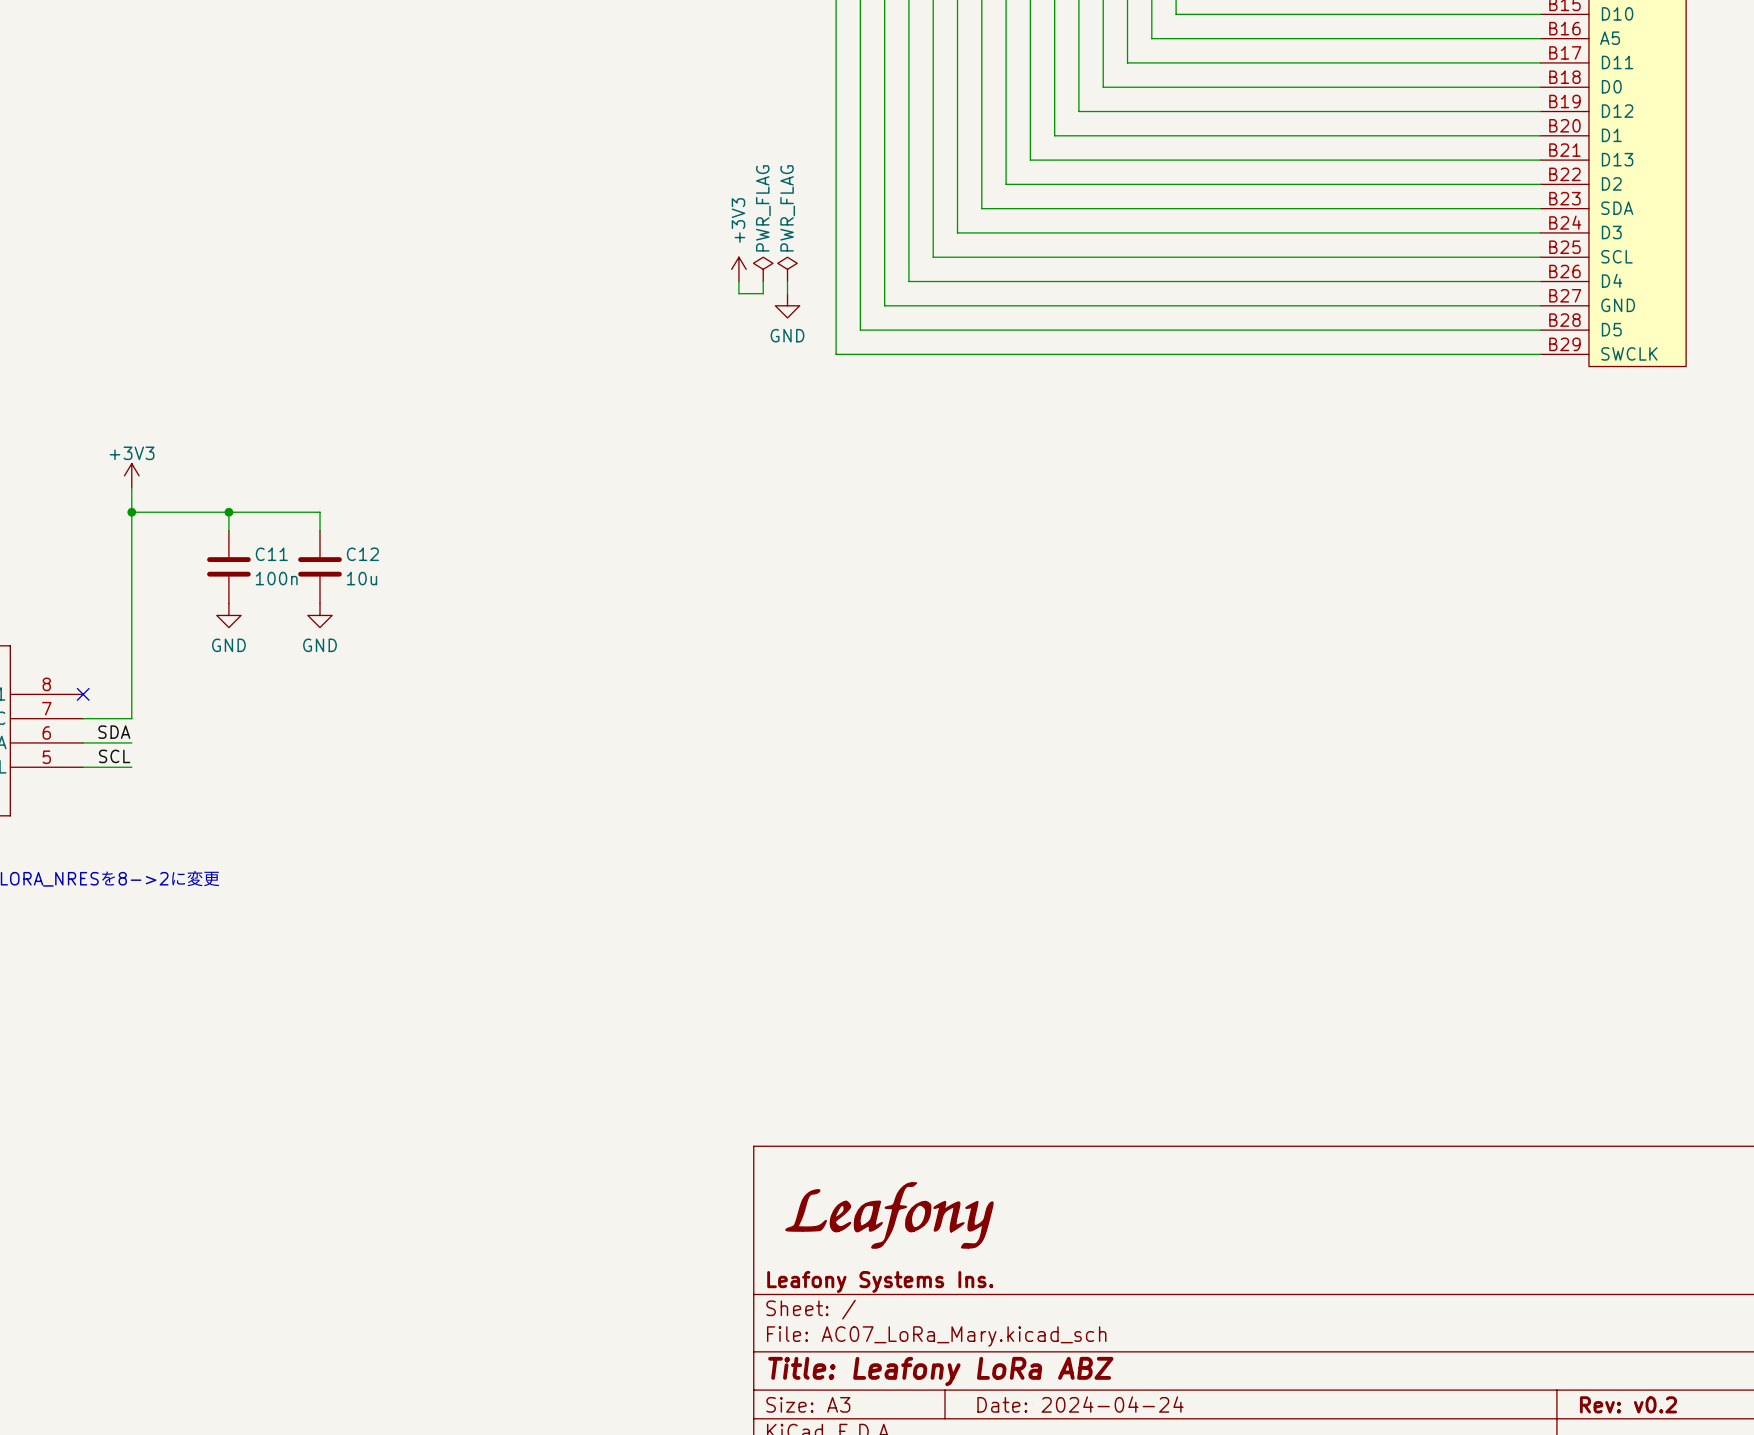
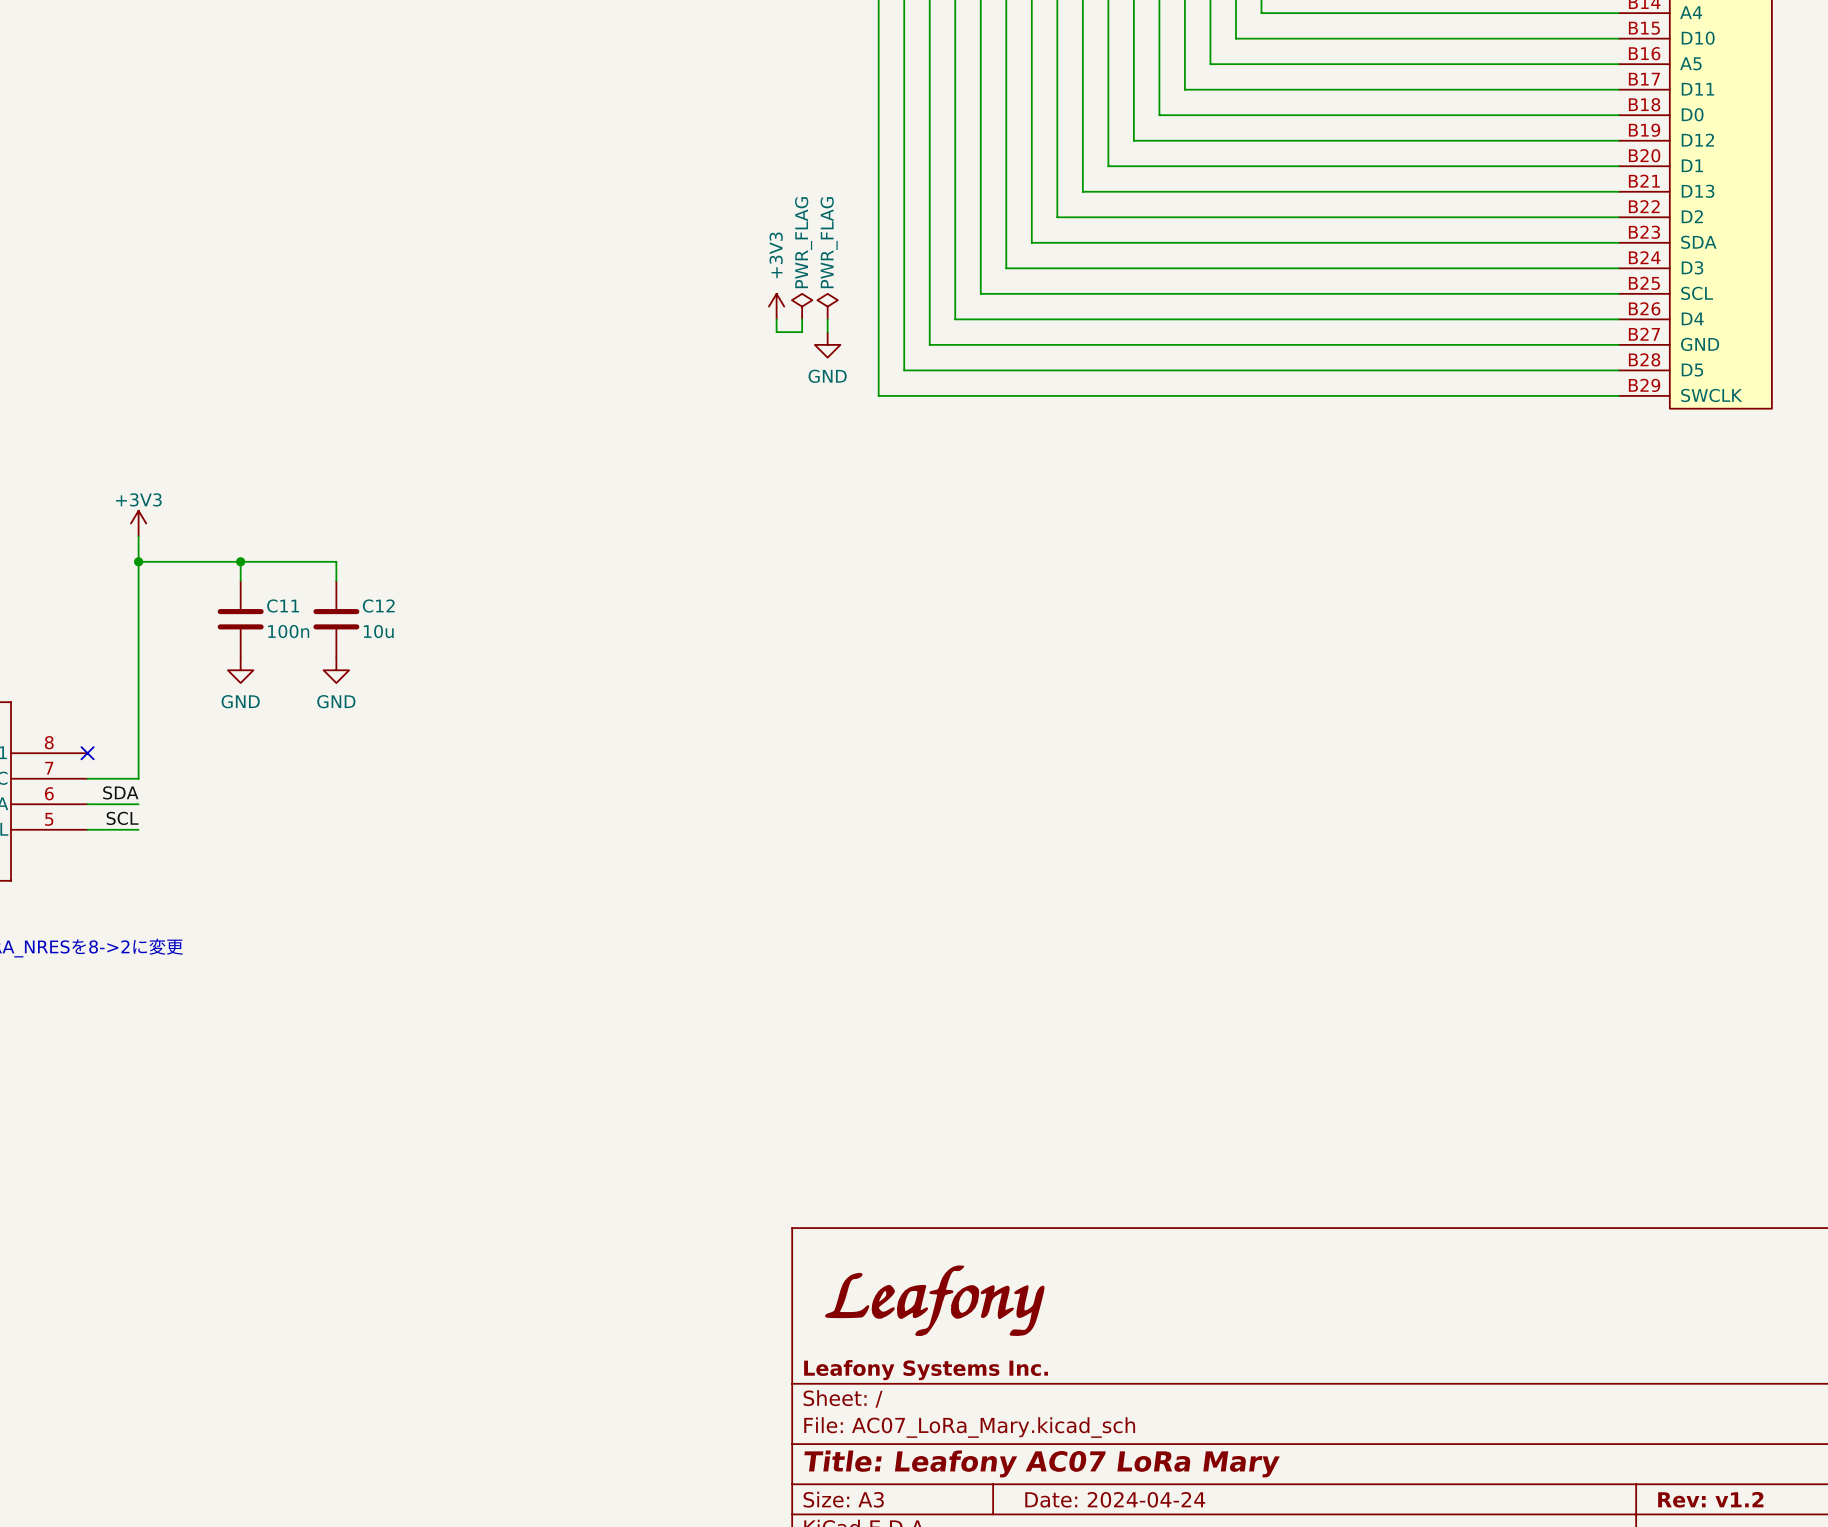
title block: Leafony Systems Ins. (880, 1281) -> Leafony Systems Inc. (926, 1370)
title block: Title: Leafony LoRa ABZ (940, 1371) -> Title: Leafony AC07 LoRa Mary (1042, 1463)
title block: Rev: v0.2 (1628, 1404) -> Rev: v1.2 (1710, 1499)

